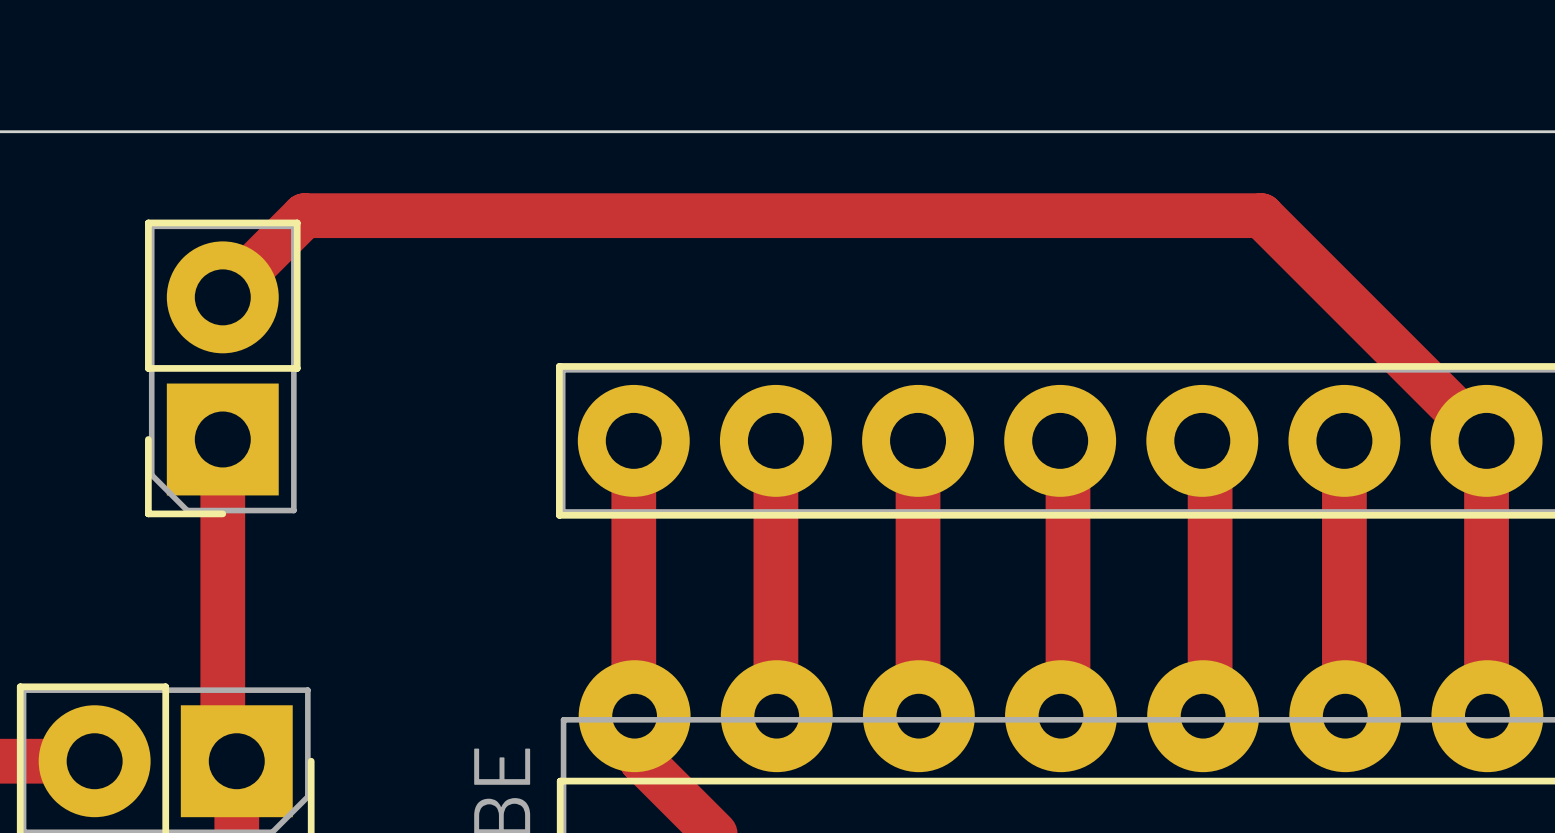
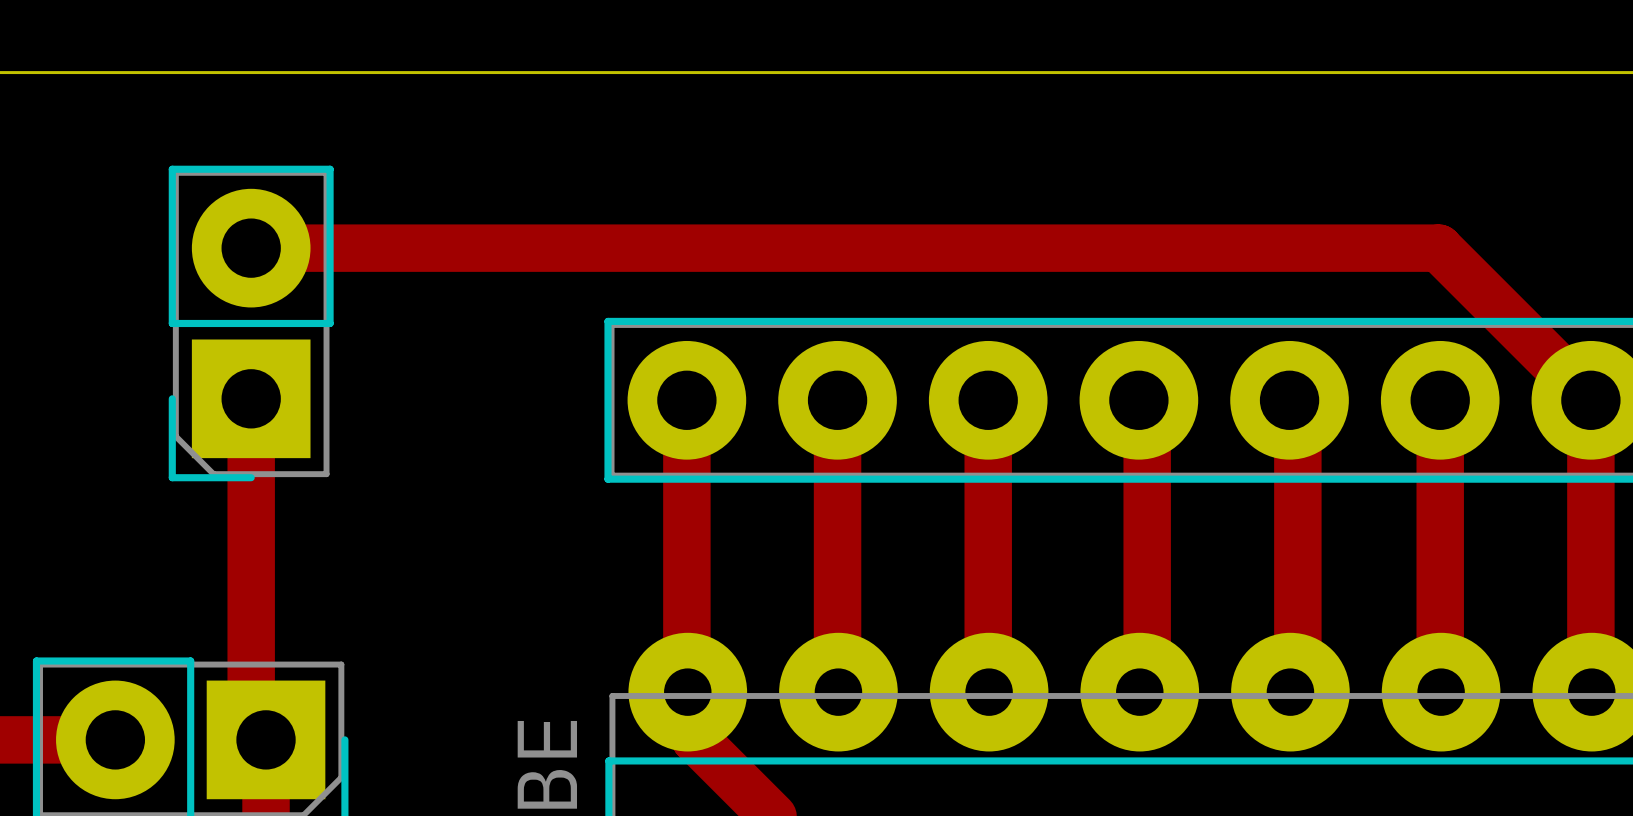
top track: (222, 297) (304, 215) (1261, 215) (1343, 297) -> (251, 248) (1438, 248)

